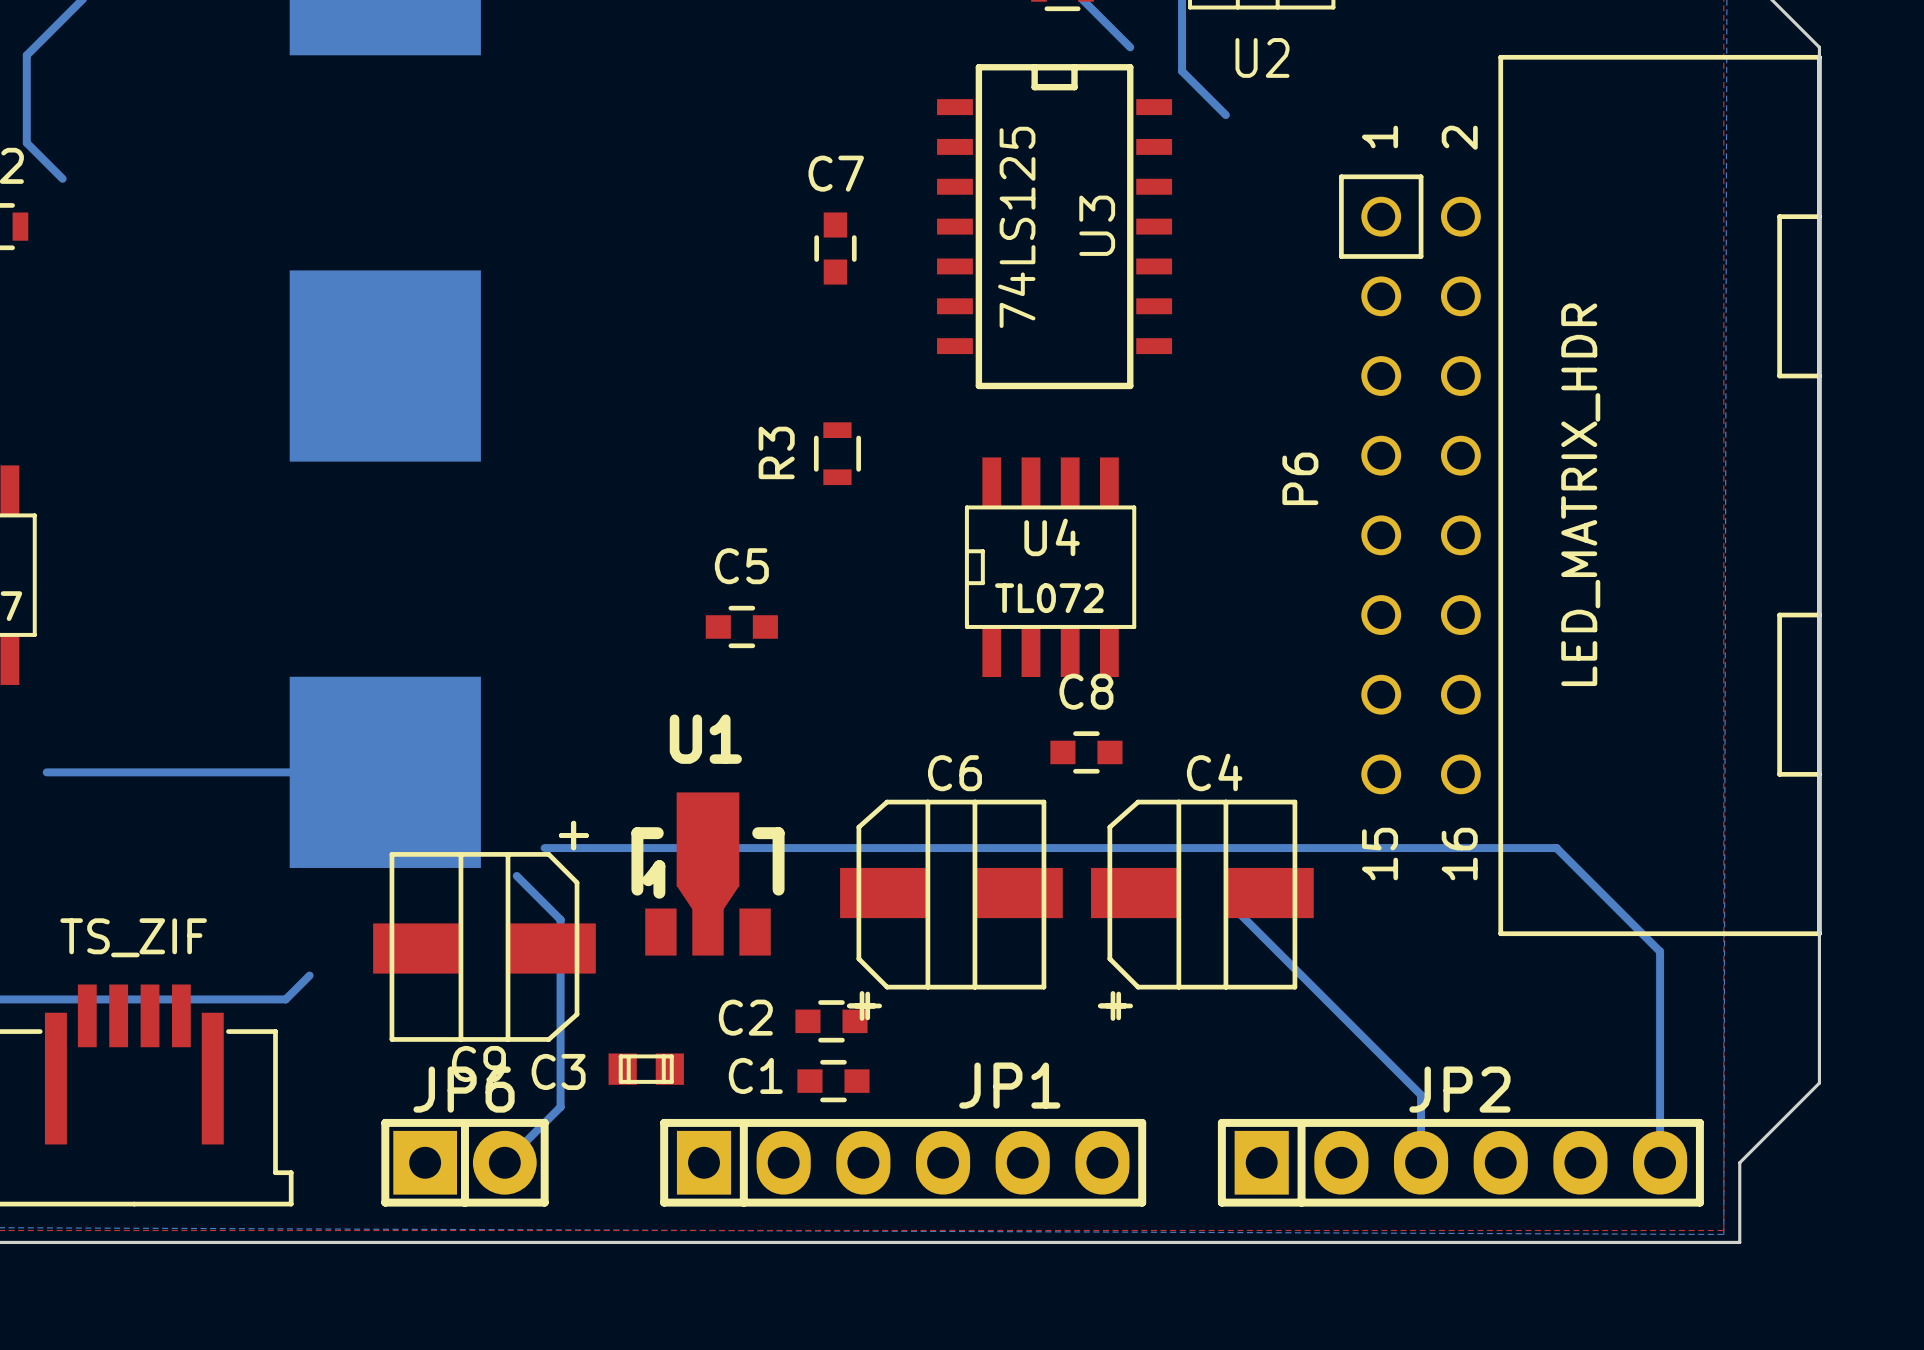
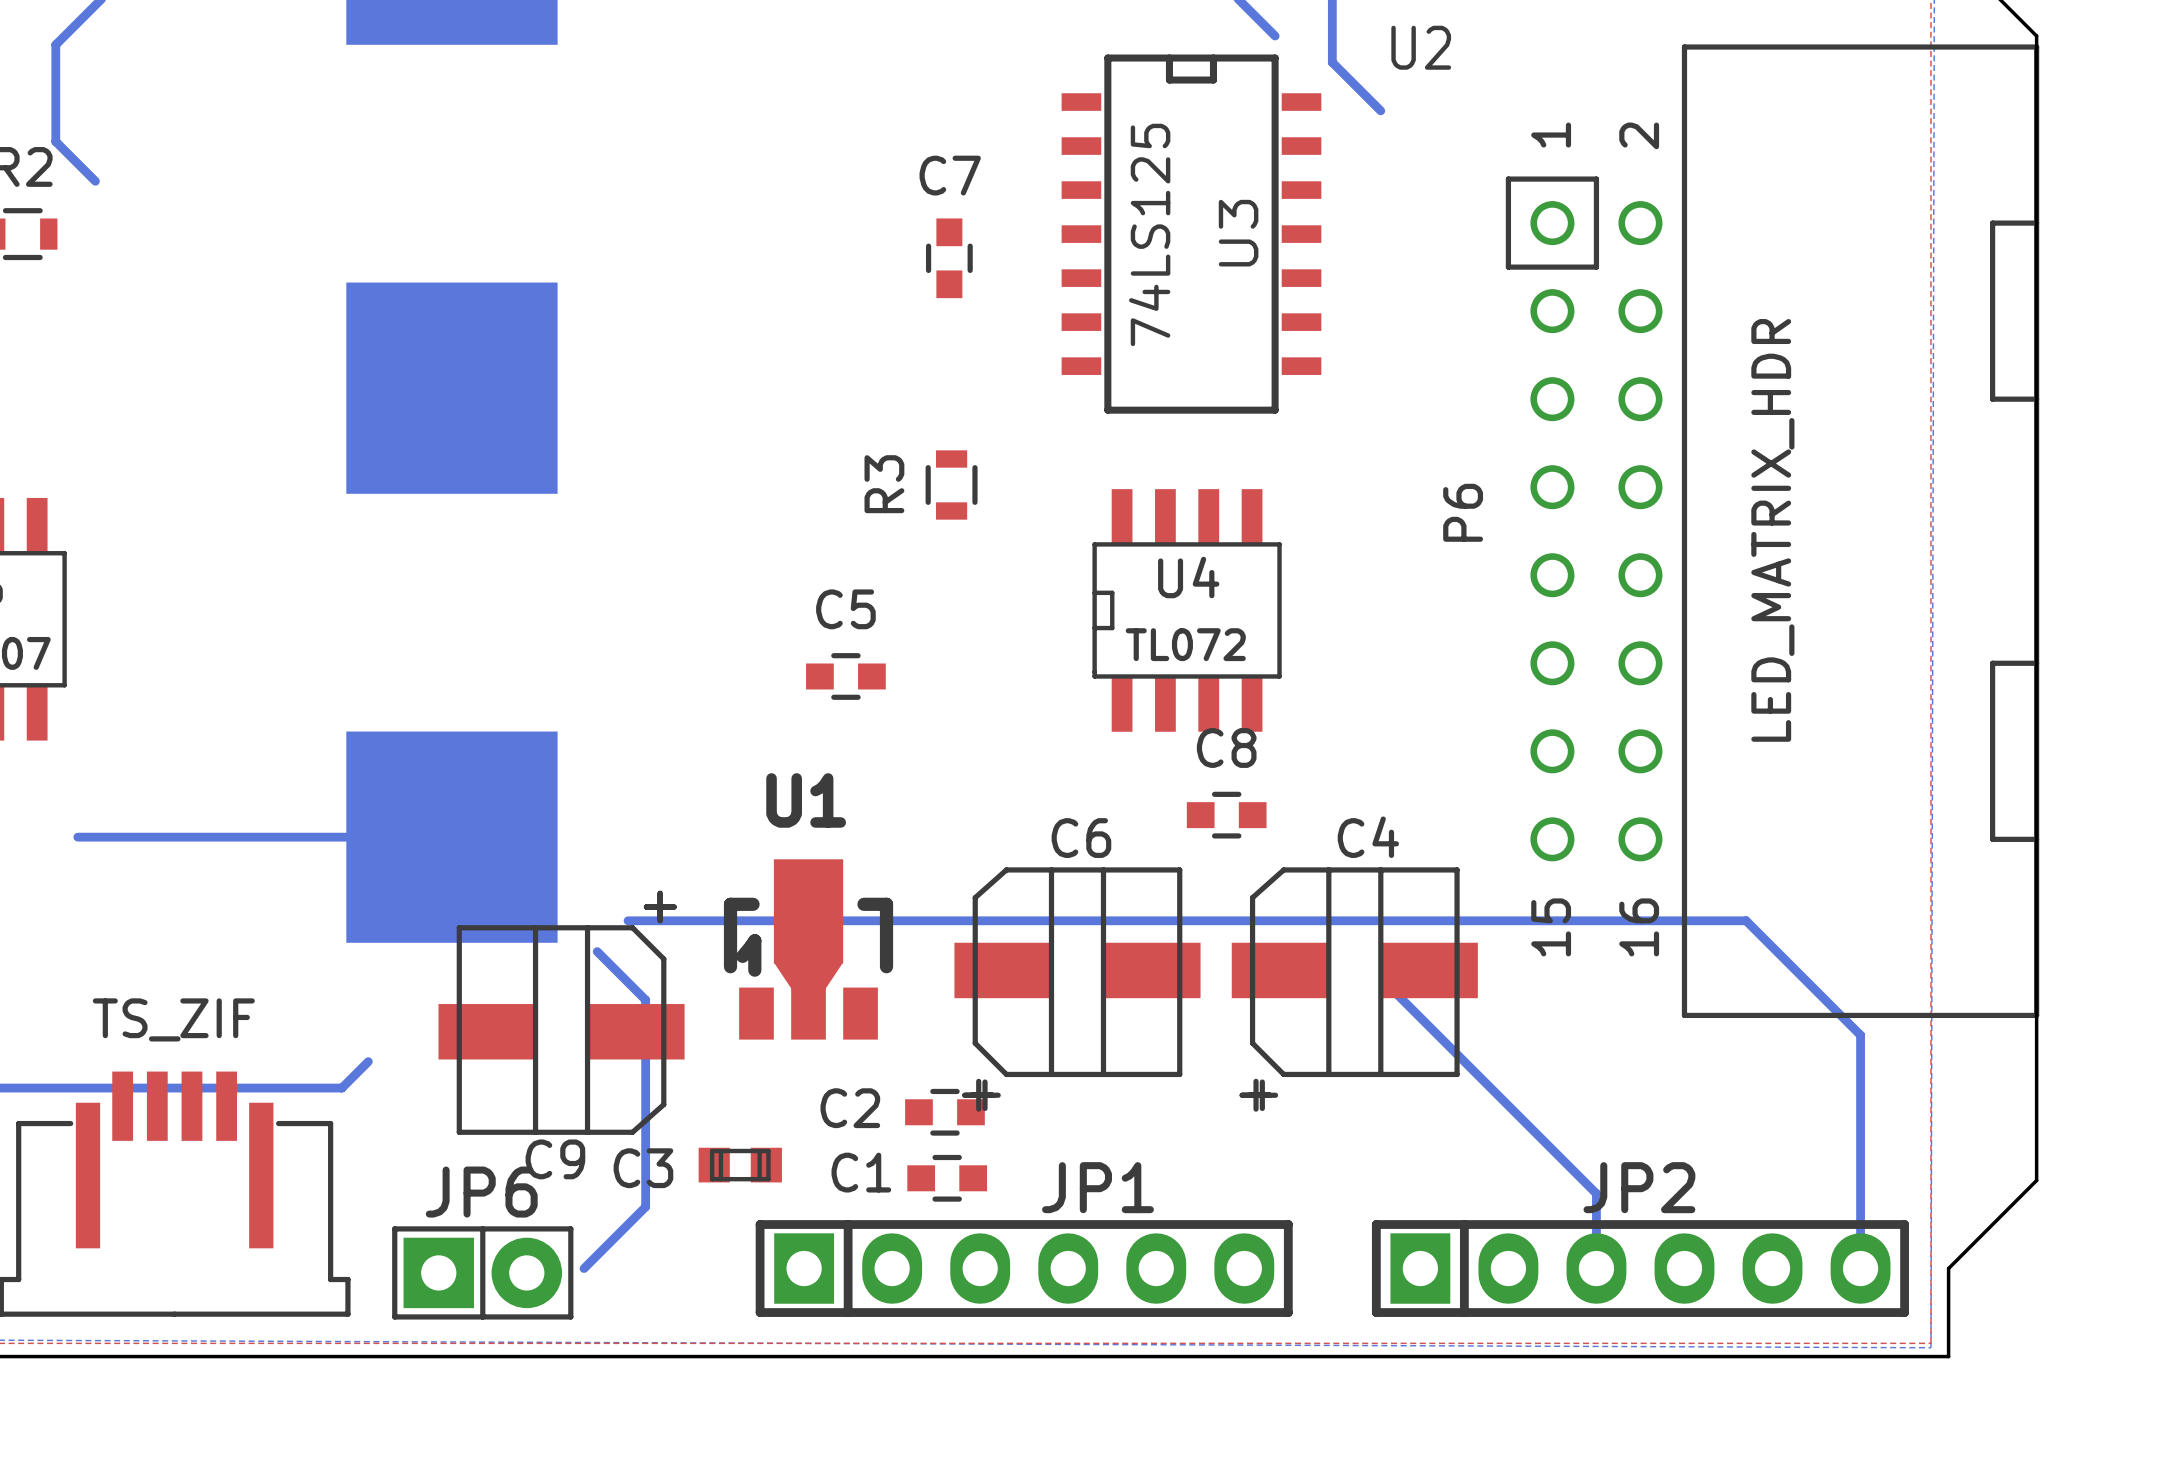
JP1 name position: JP1 (1009, 1085) -> JP1 (1097, 1187)
JP6 footprint: [381, 1118, 549, 1207] -> [392, 1226, 574, 1320]

